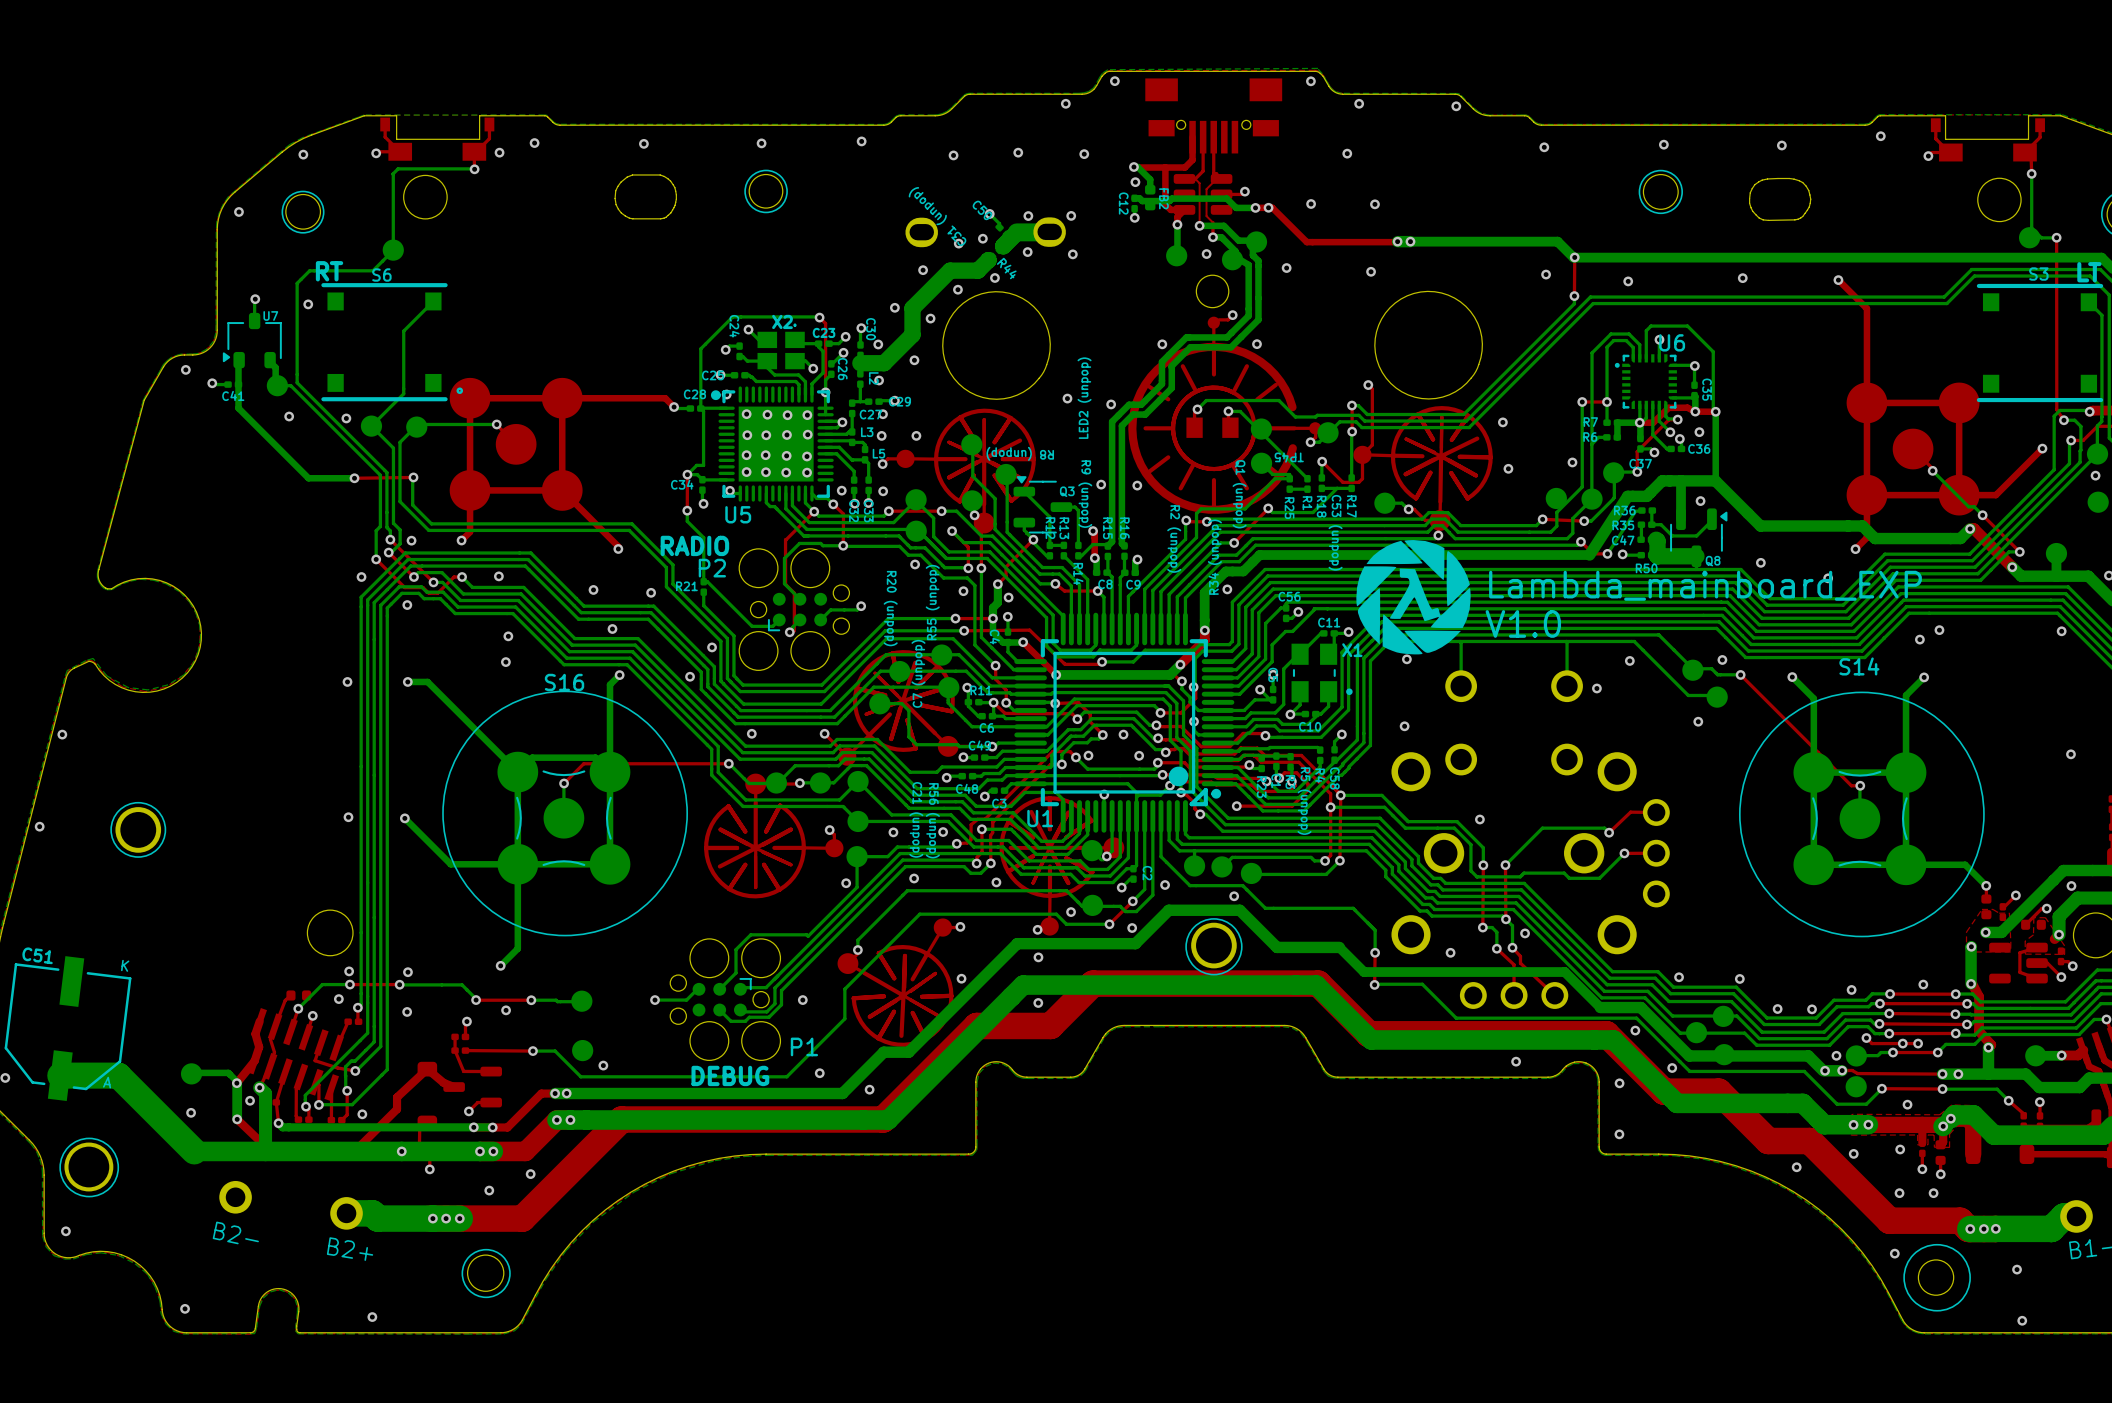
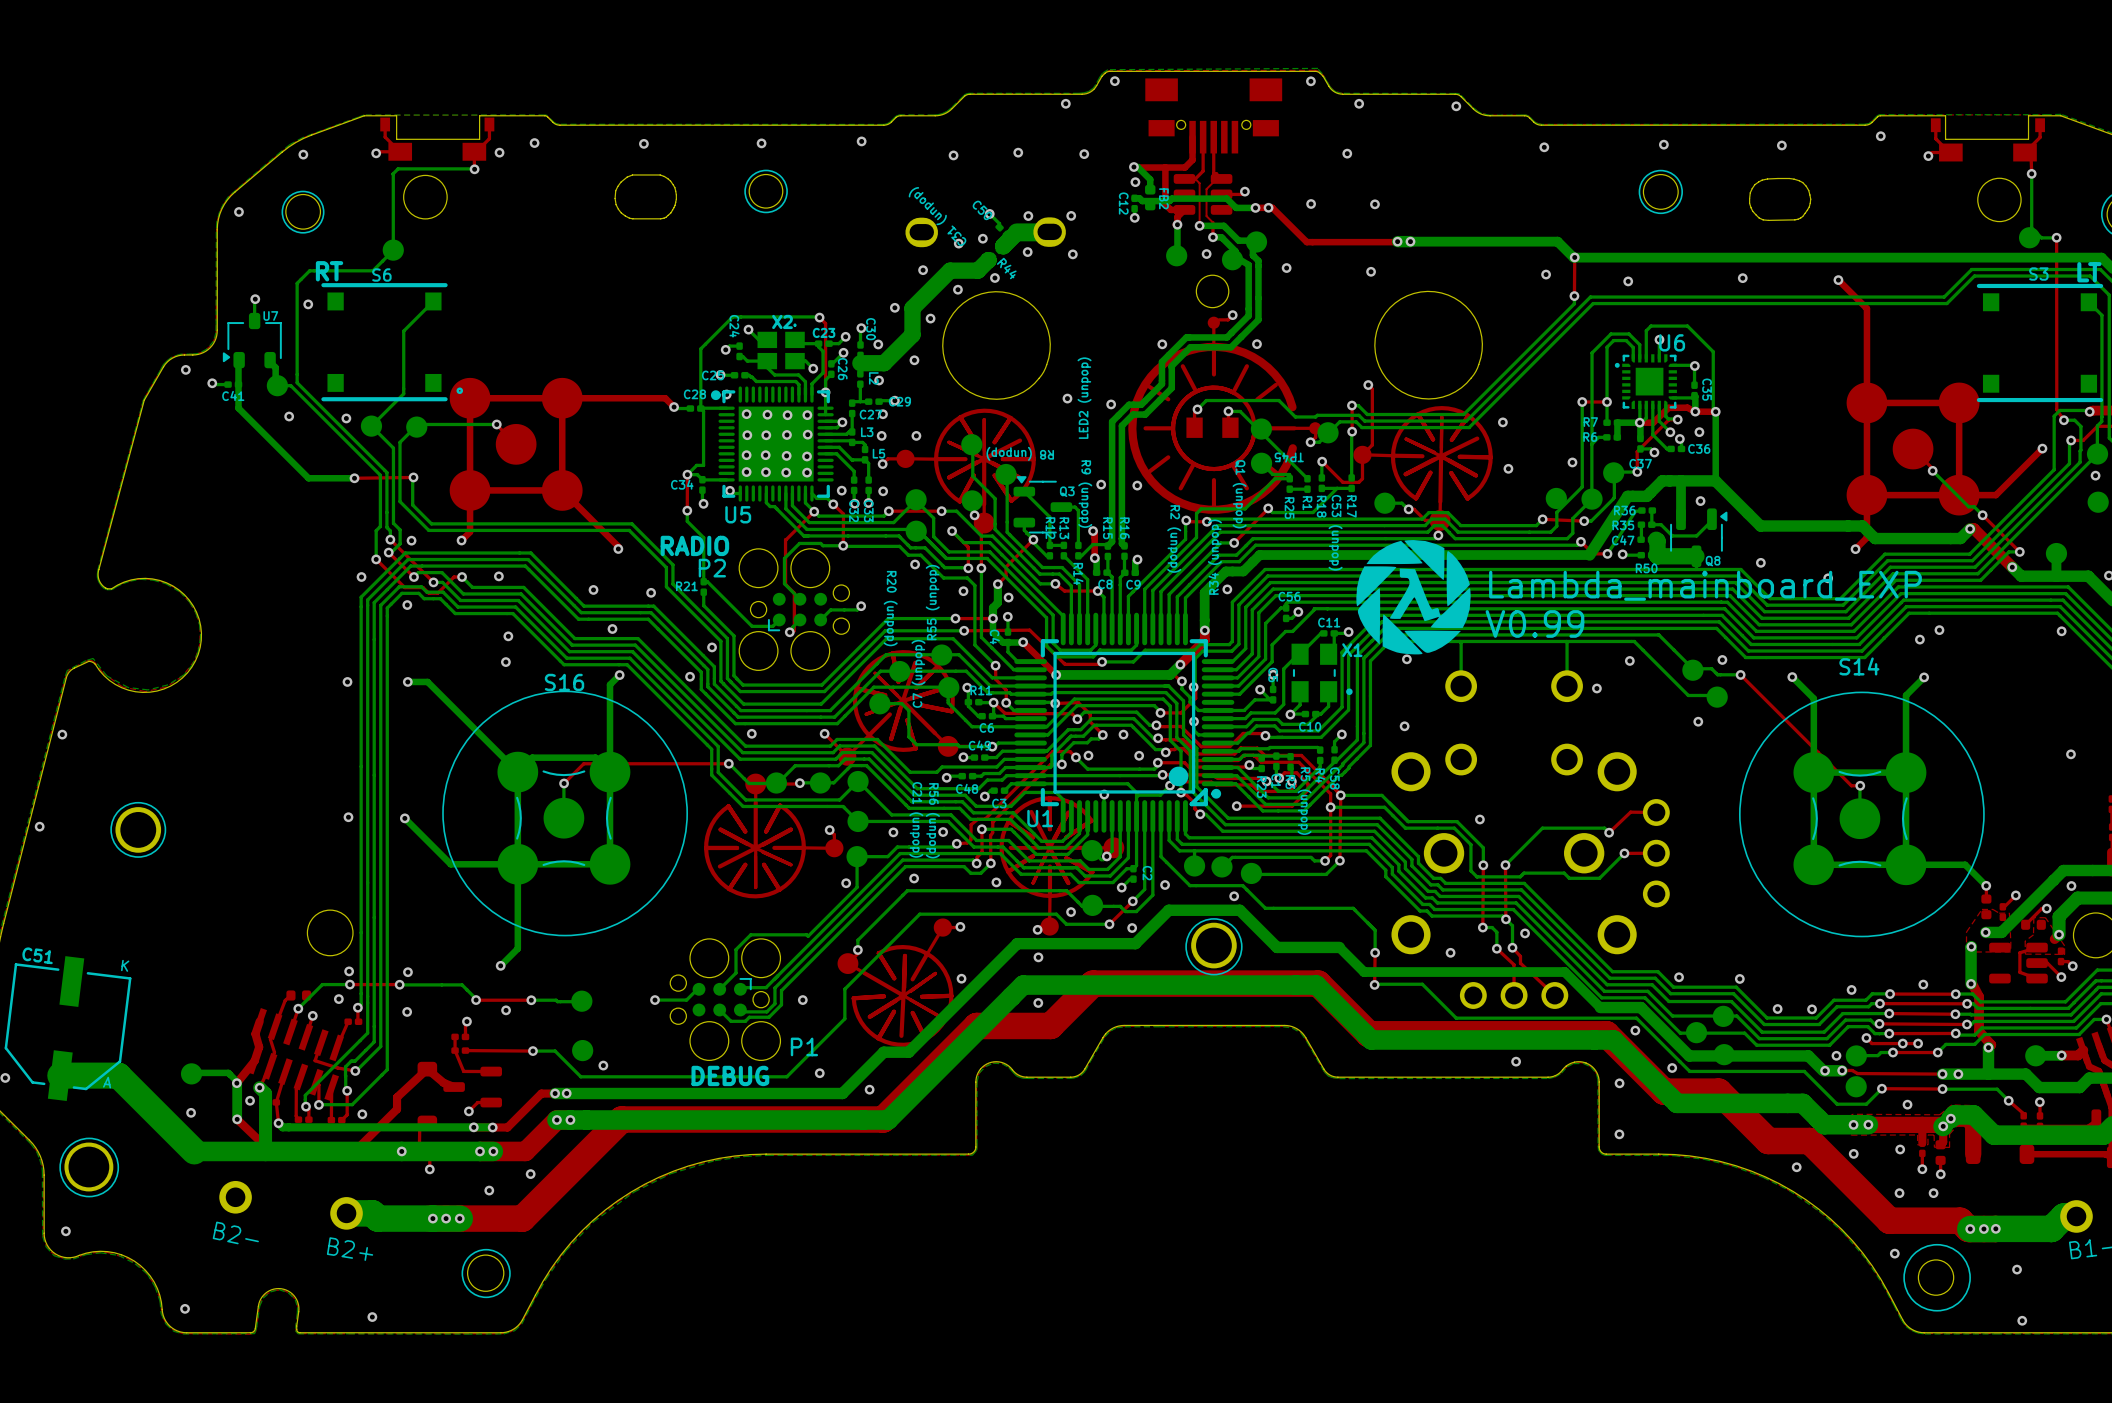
U6 footprint: [1614, 354, 1677, 410] -> [1614, 354, 1677, 410]
text: V1.0 (1523, 623) -> V0.99 (1534, 623)

